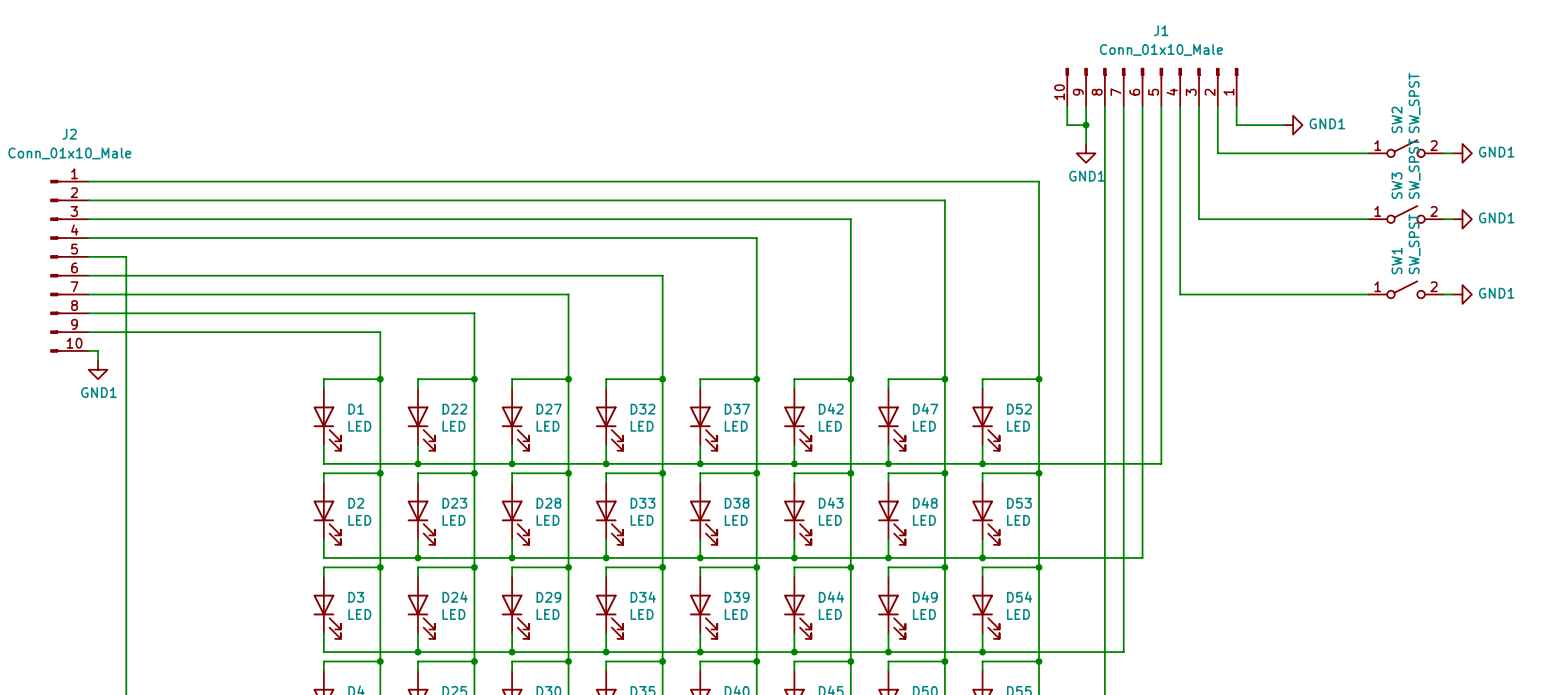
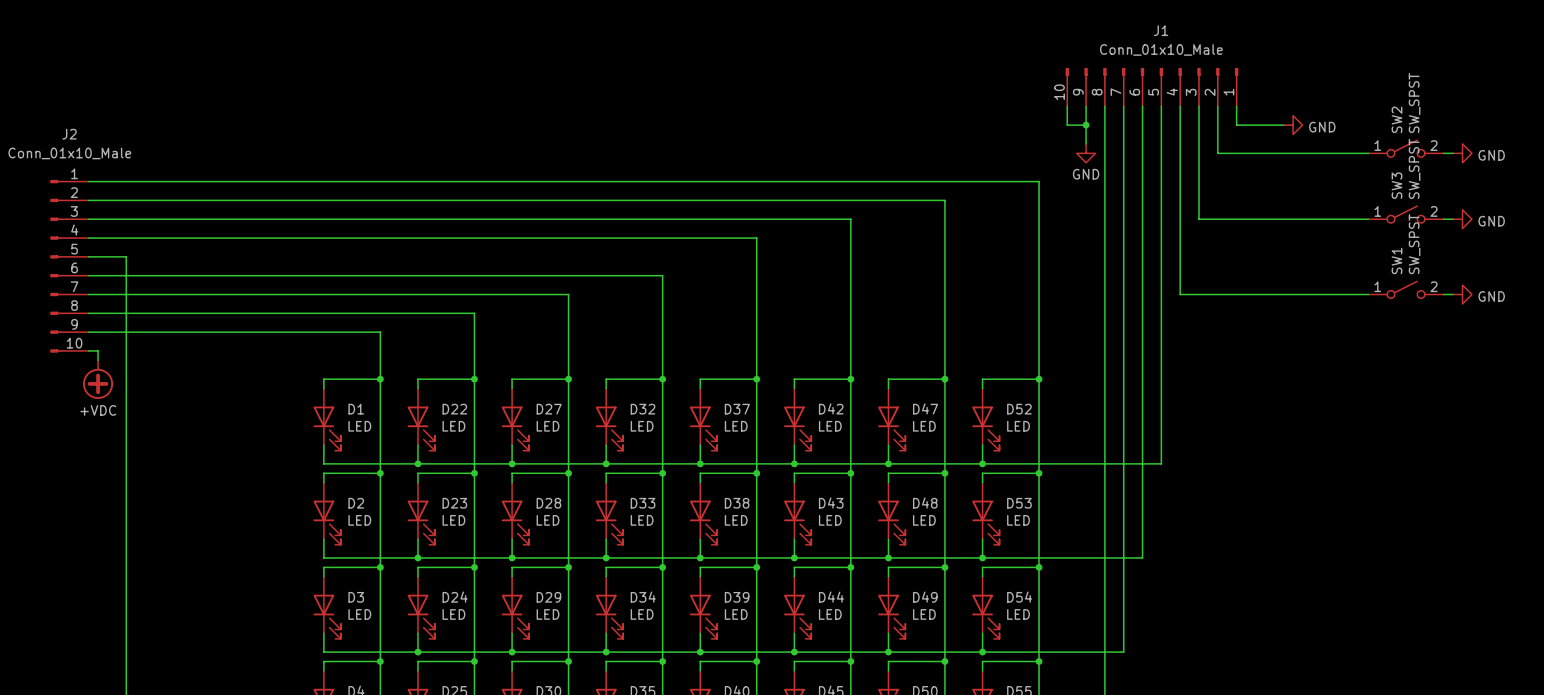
power symbol: GND1 (1293, 125) -> GND (1293, 125)
power symbol: GND1 (1086, 153) -> GND (1086, 153)
power symbol: GND1 (1462, 153) -> GND (1462, 153)
power symbol: GND1 (1462, 219) -> GND (1462, 219)
power symbol: GND1 (1462, 294) -> GND (1462, 294)
power symbol: GND1 (98, 369) -> none
power symbol: none -> +VDC (98, 379)

